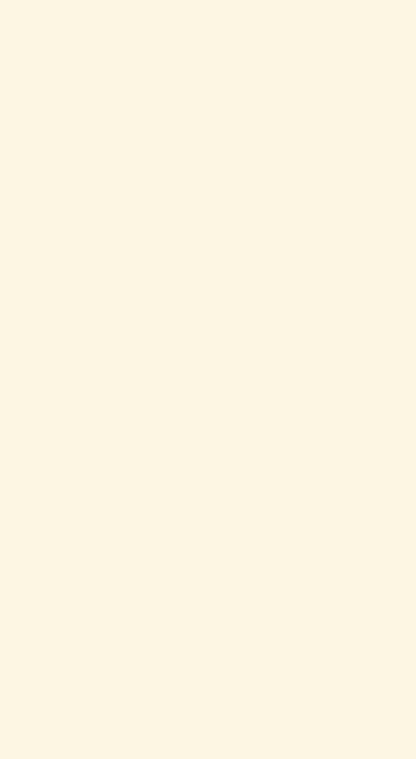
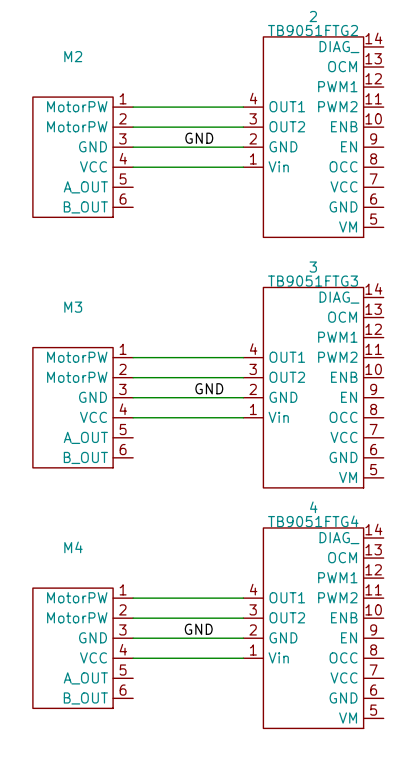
wire: none -> (133, 107) (243, 107)
wire: none -> (133, 127) (243, 127)
TB9051FTG2: none -> 2 (313, 137)
label: none -> GND (199, 138)
wire: none -> (133, 147) (243, 147)
M2: none -> (83, 157)
wire: none -> (133, 167) (243, 167)
wire: none -> (133, 357) (243, 357)
wire: none -> (133, 377) (243, 377)
TB9051FTG3: none -> 3 (313, 387)
label: none -> GND (209, 388)
wire: none -> (133, 397) (243, 397)
M3: none -> (83, 407)
wire: none -> (133, 417) (243, 417)
wire: none -> (133, 598) (243, 598)
wire: none -> (133, 618) (243, 618)
TB9051FTG4: none -> 4 (313, 628)
label: none -> GND (198, 629)
wire: none -> (133, 638) (243, 638)
M4: none -> (83, 648)
wire: none -> (133, 658) (243, 658)

